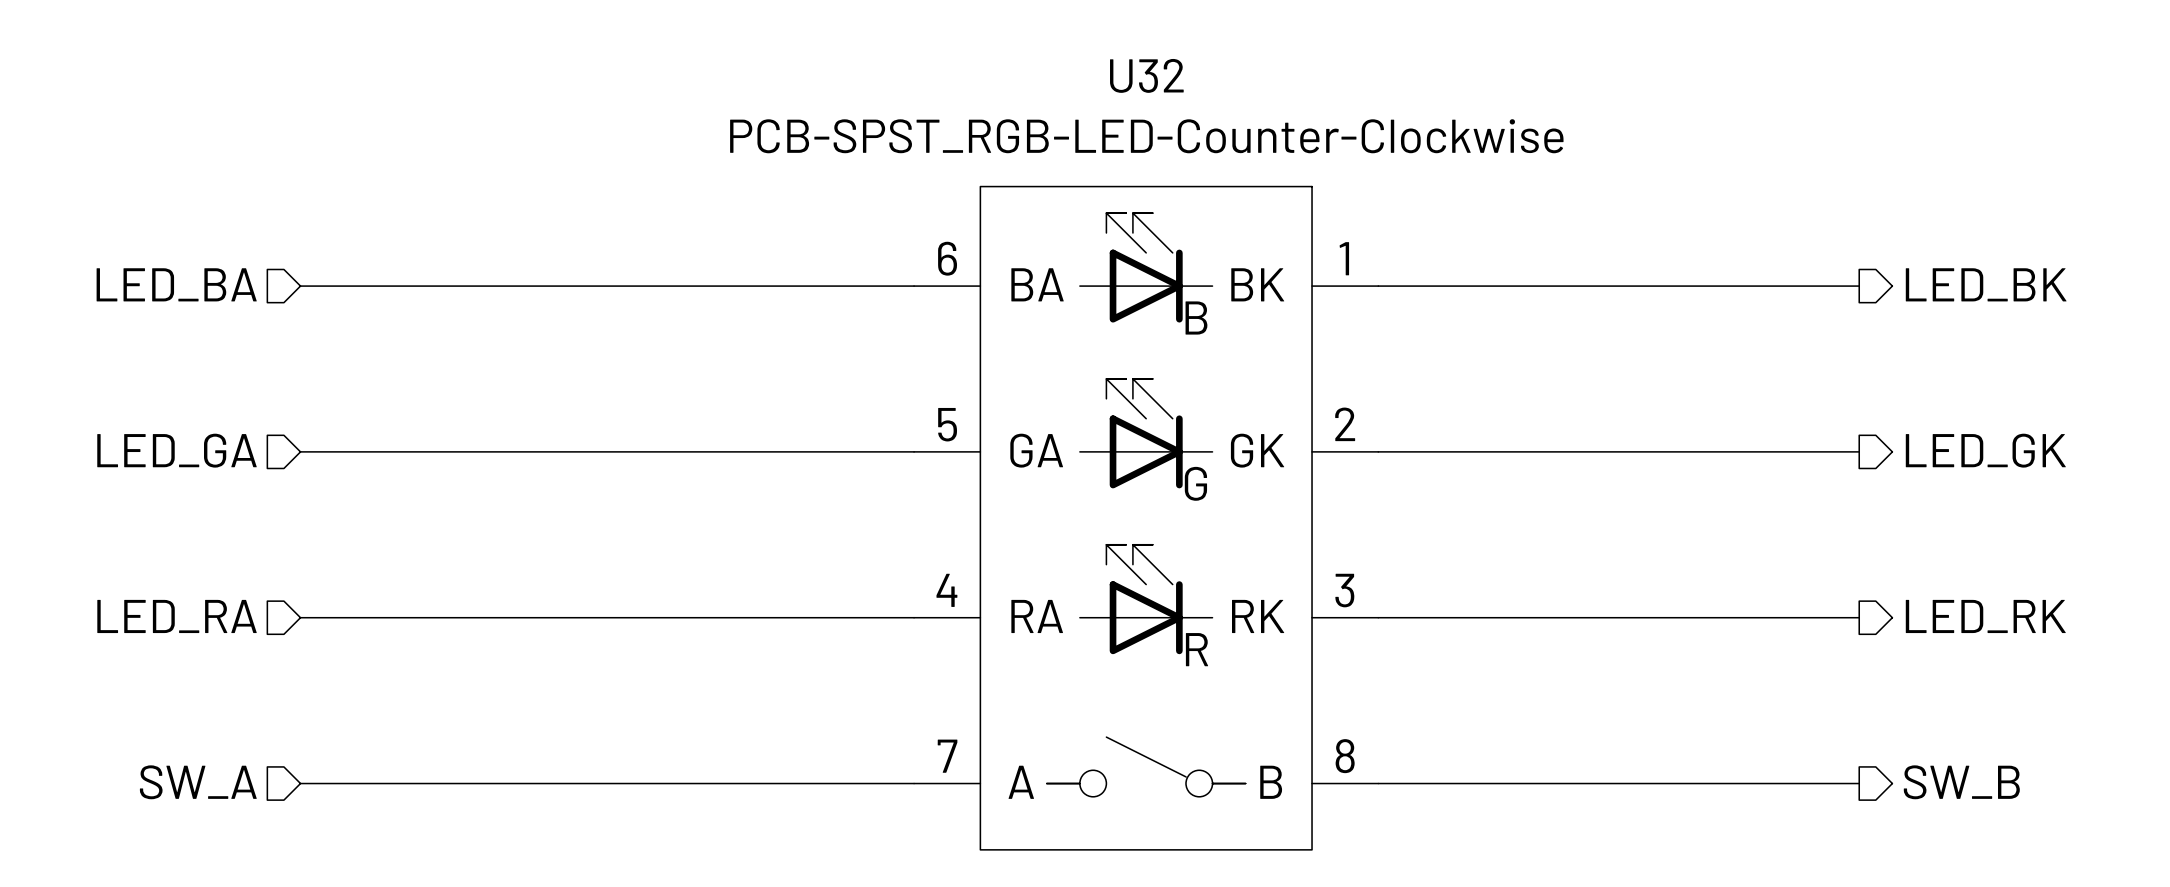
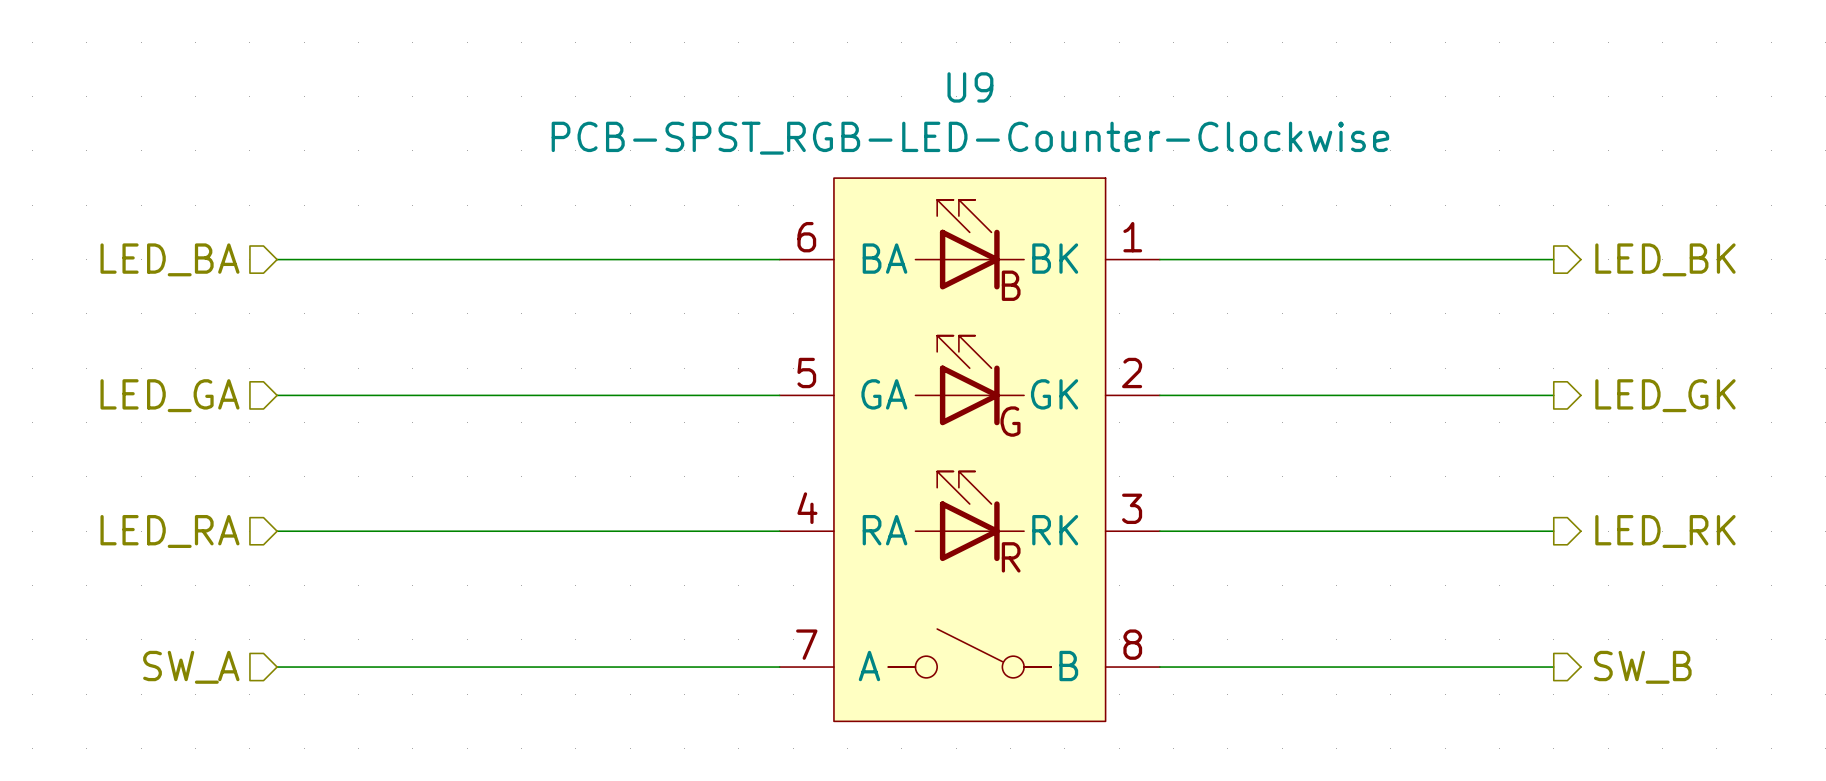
U32 name: U32 (1146, 75) -> U9 (970, 87)

